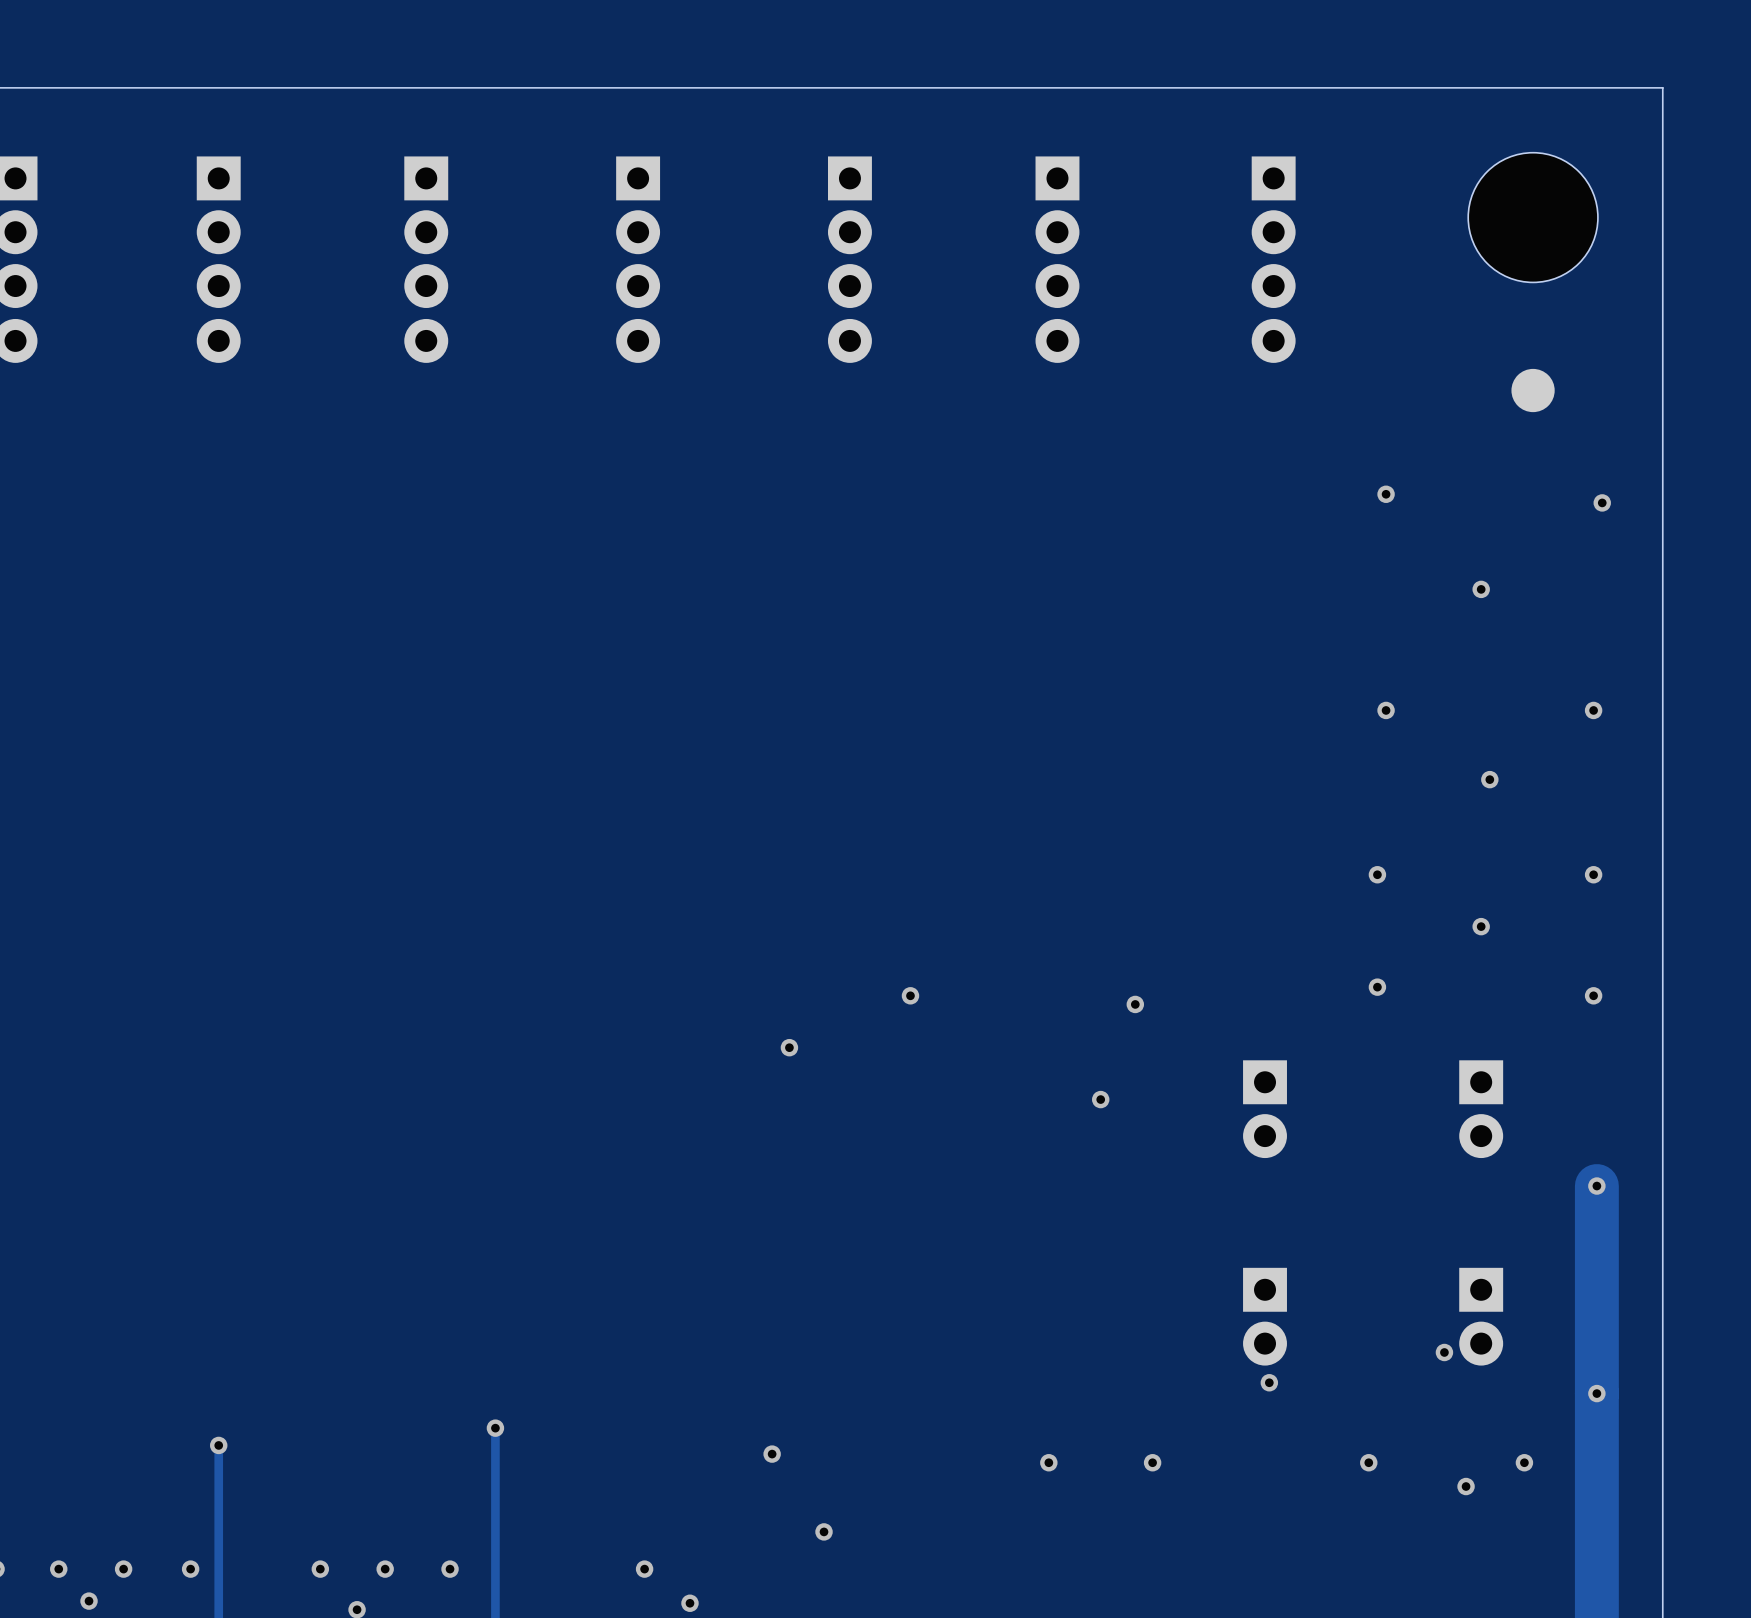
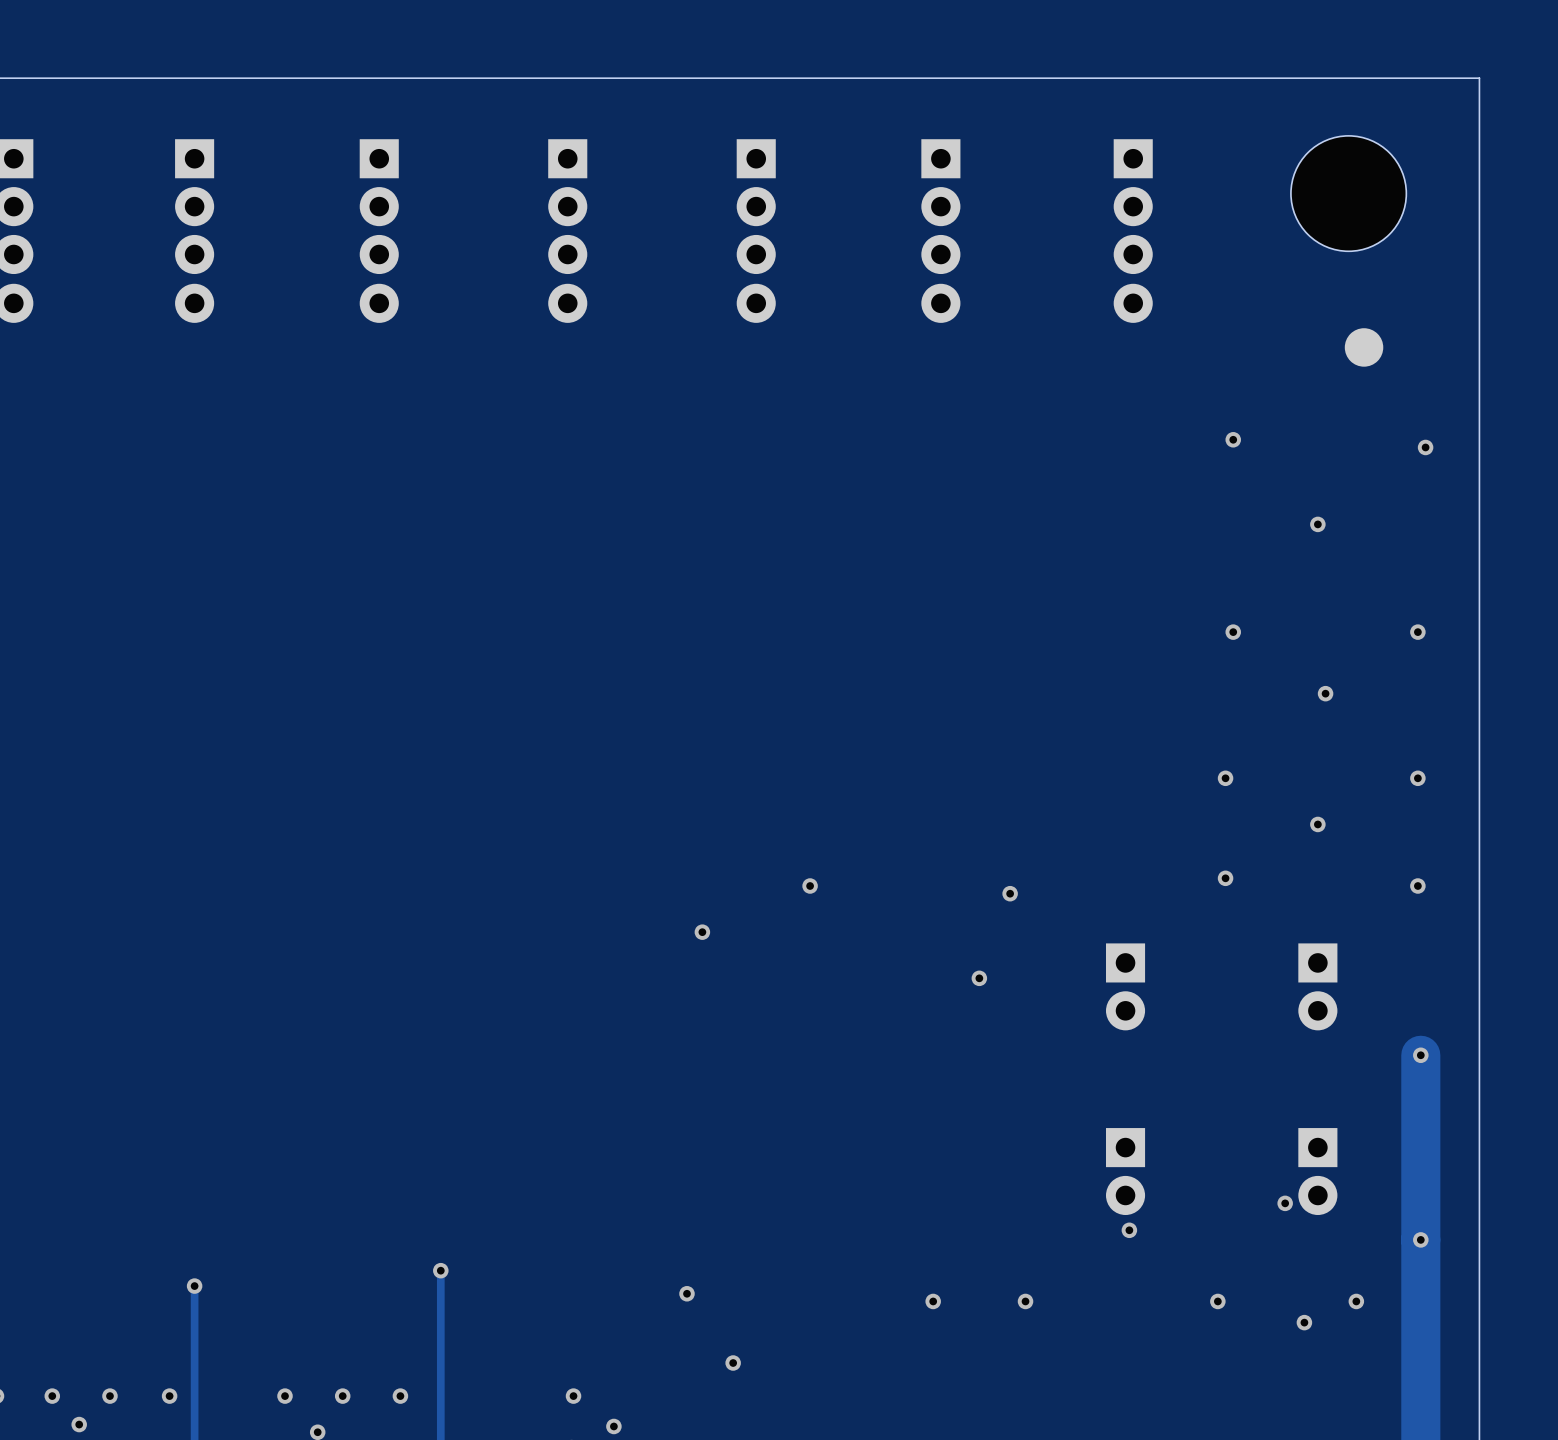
hole position: (1533, 217) -> (1348, 193)

